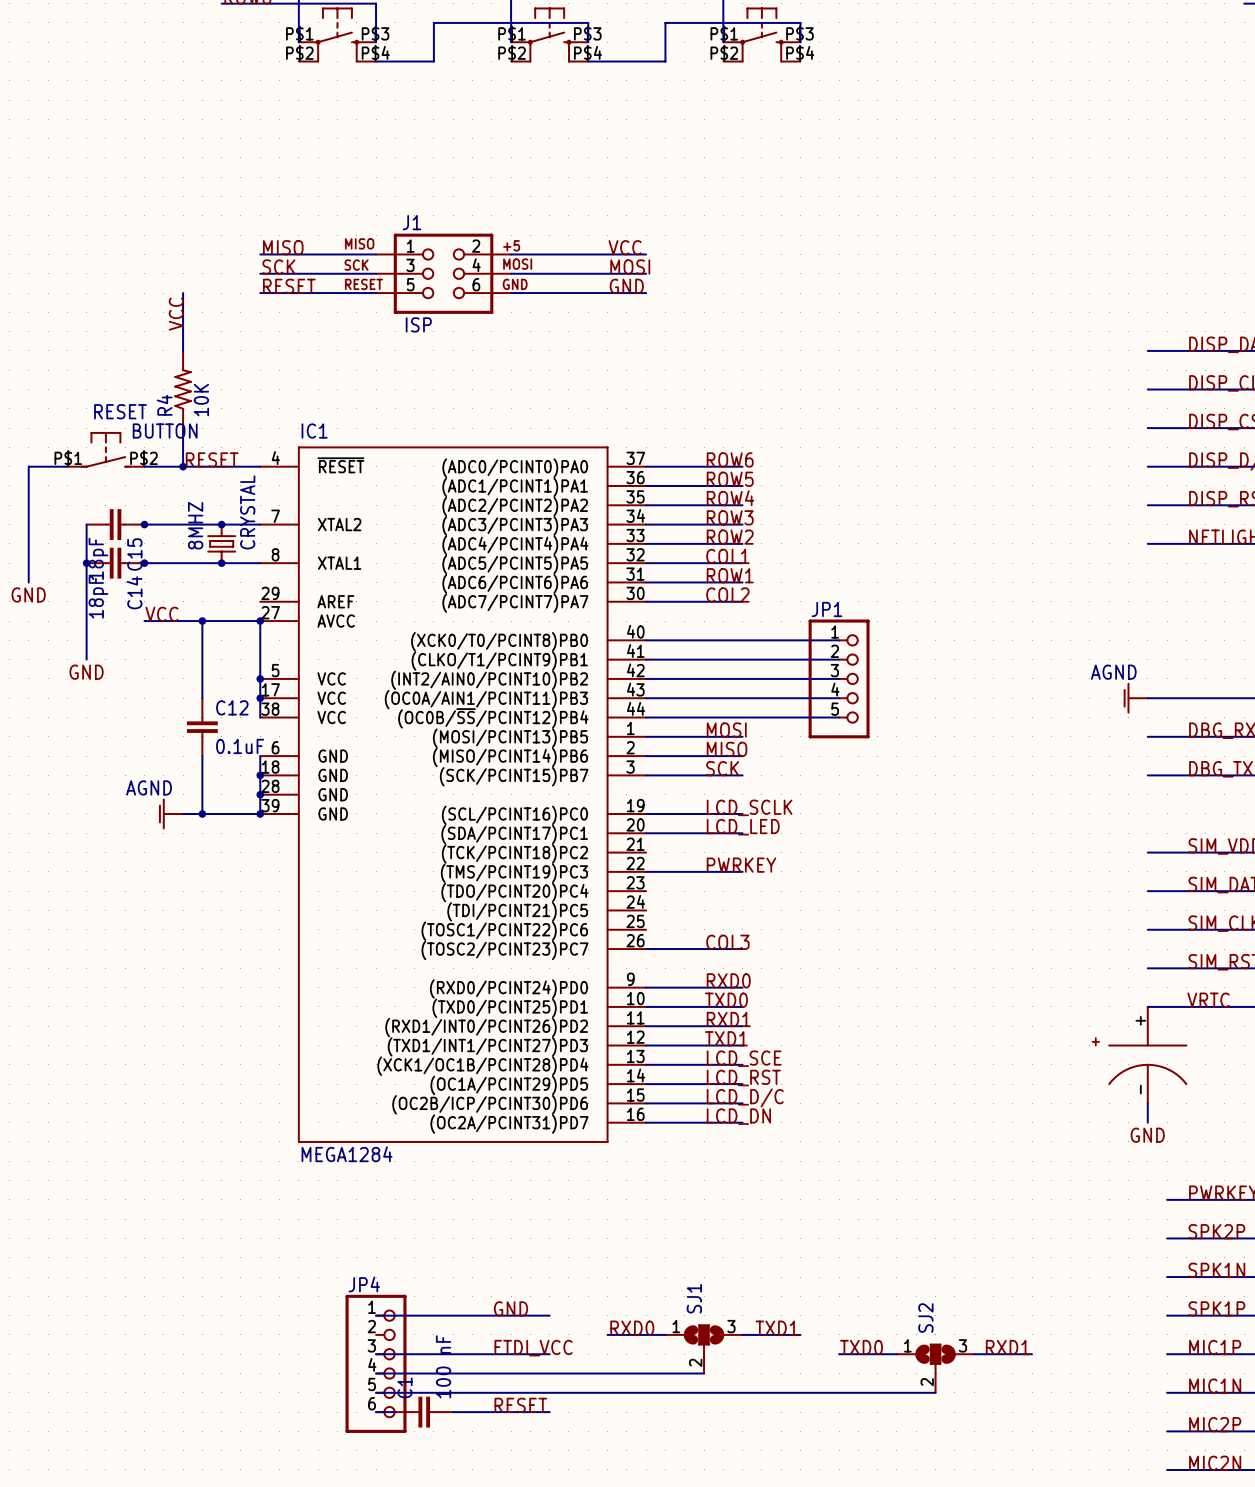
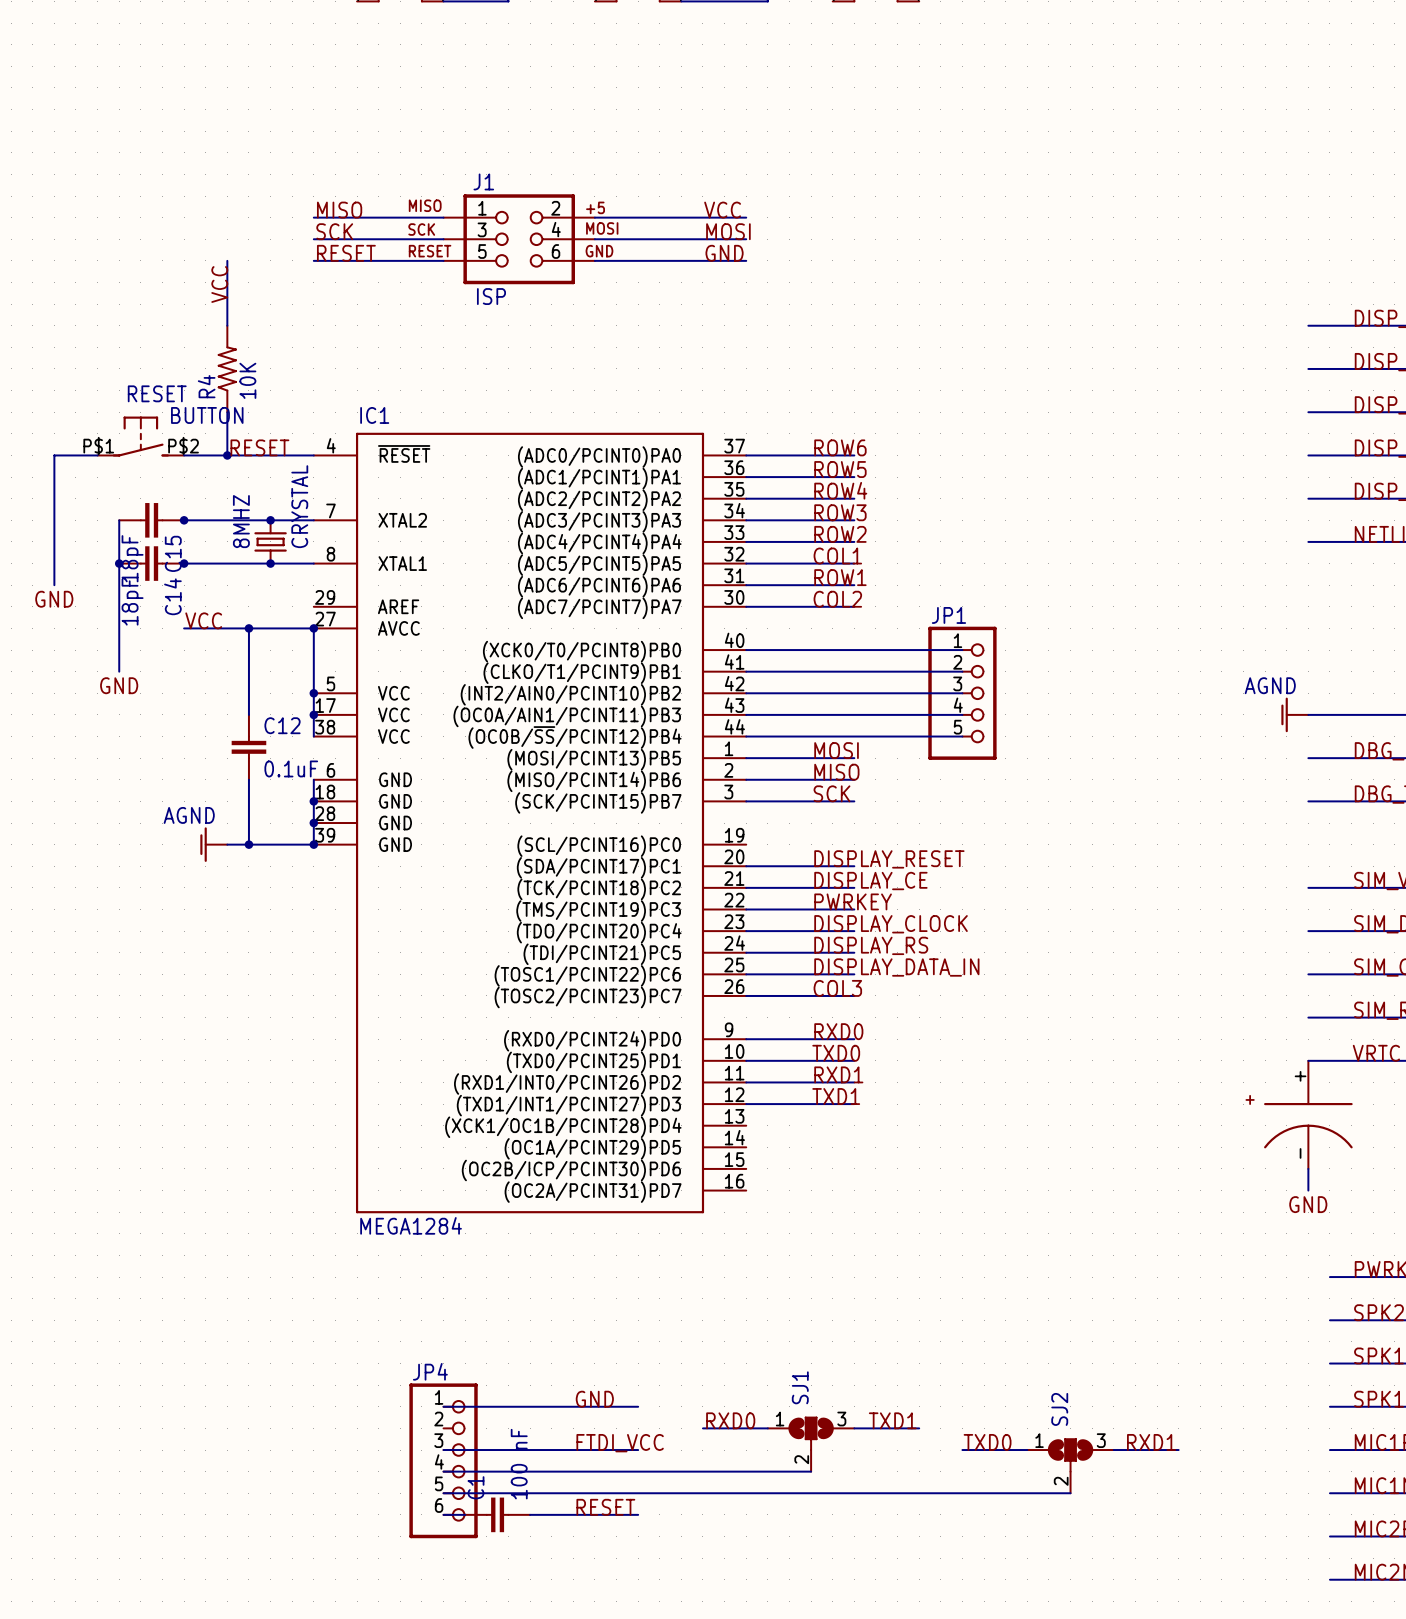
label: LCD_SCLK (749, 807) -> none
wire: (646, 813) (742, 813) -> (746, 887) (854, 887)
label: LCD_LED (743, 827) -> DISPLAY_RESET (889, 859)
label: none -> DISPLAY_CE (870, 881)
label: none -> DISPLAY_CLOCK (891, 924)
label: none -> DISPLAY_RS (871, 945)
label: none -> DISPLAY_DATA_IN (896, 967)
label: LCD_SCE (744, 1058) -> none
wire: (646, 1064) (742, 1064) -> (746, 931) (854, 931)
label: LCD_RST (743, 1078) -> none
wire: (646, 1084) (742, 1084) -> (746, 952) (854, 952)
label: LCD_D/C (745, 1097) -> none
wire: (646, 1103) (742, 1103) -> (746, 974) (854, 974)
label: LCD_DN (738, 1116) -> none
wire: (646, 1122) (742, 1122) -> none

